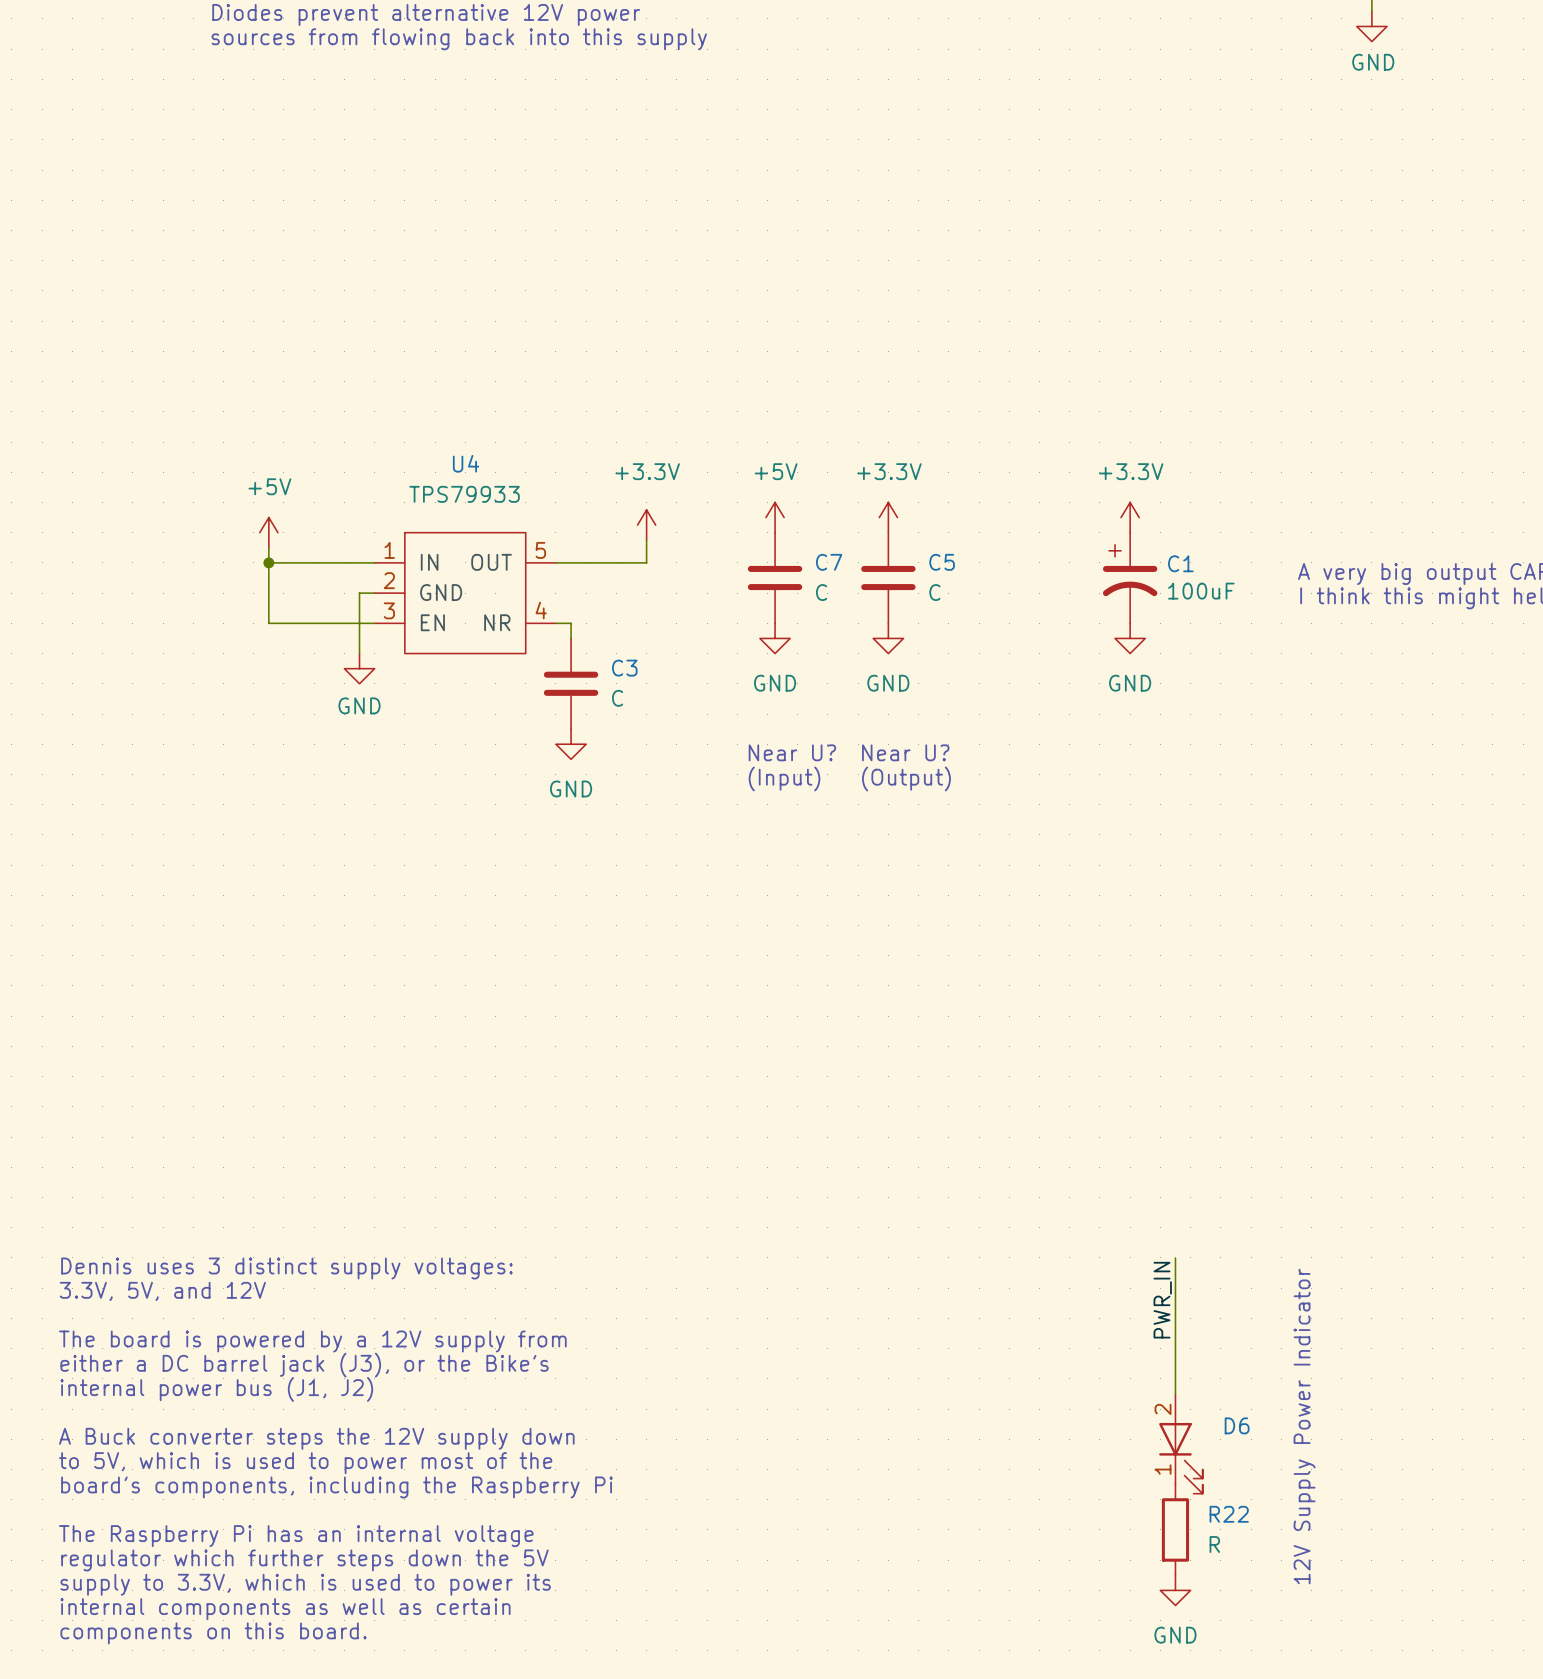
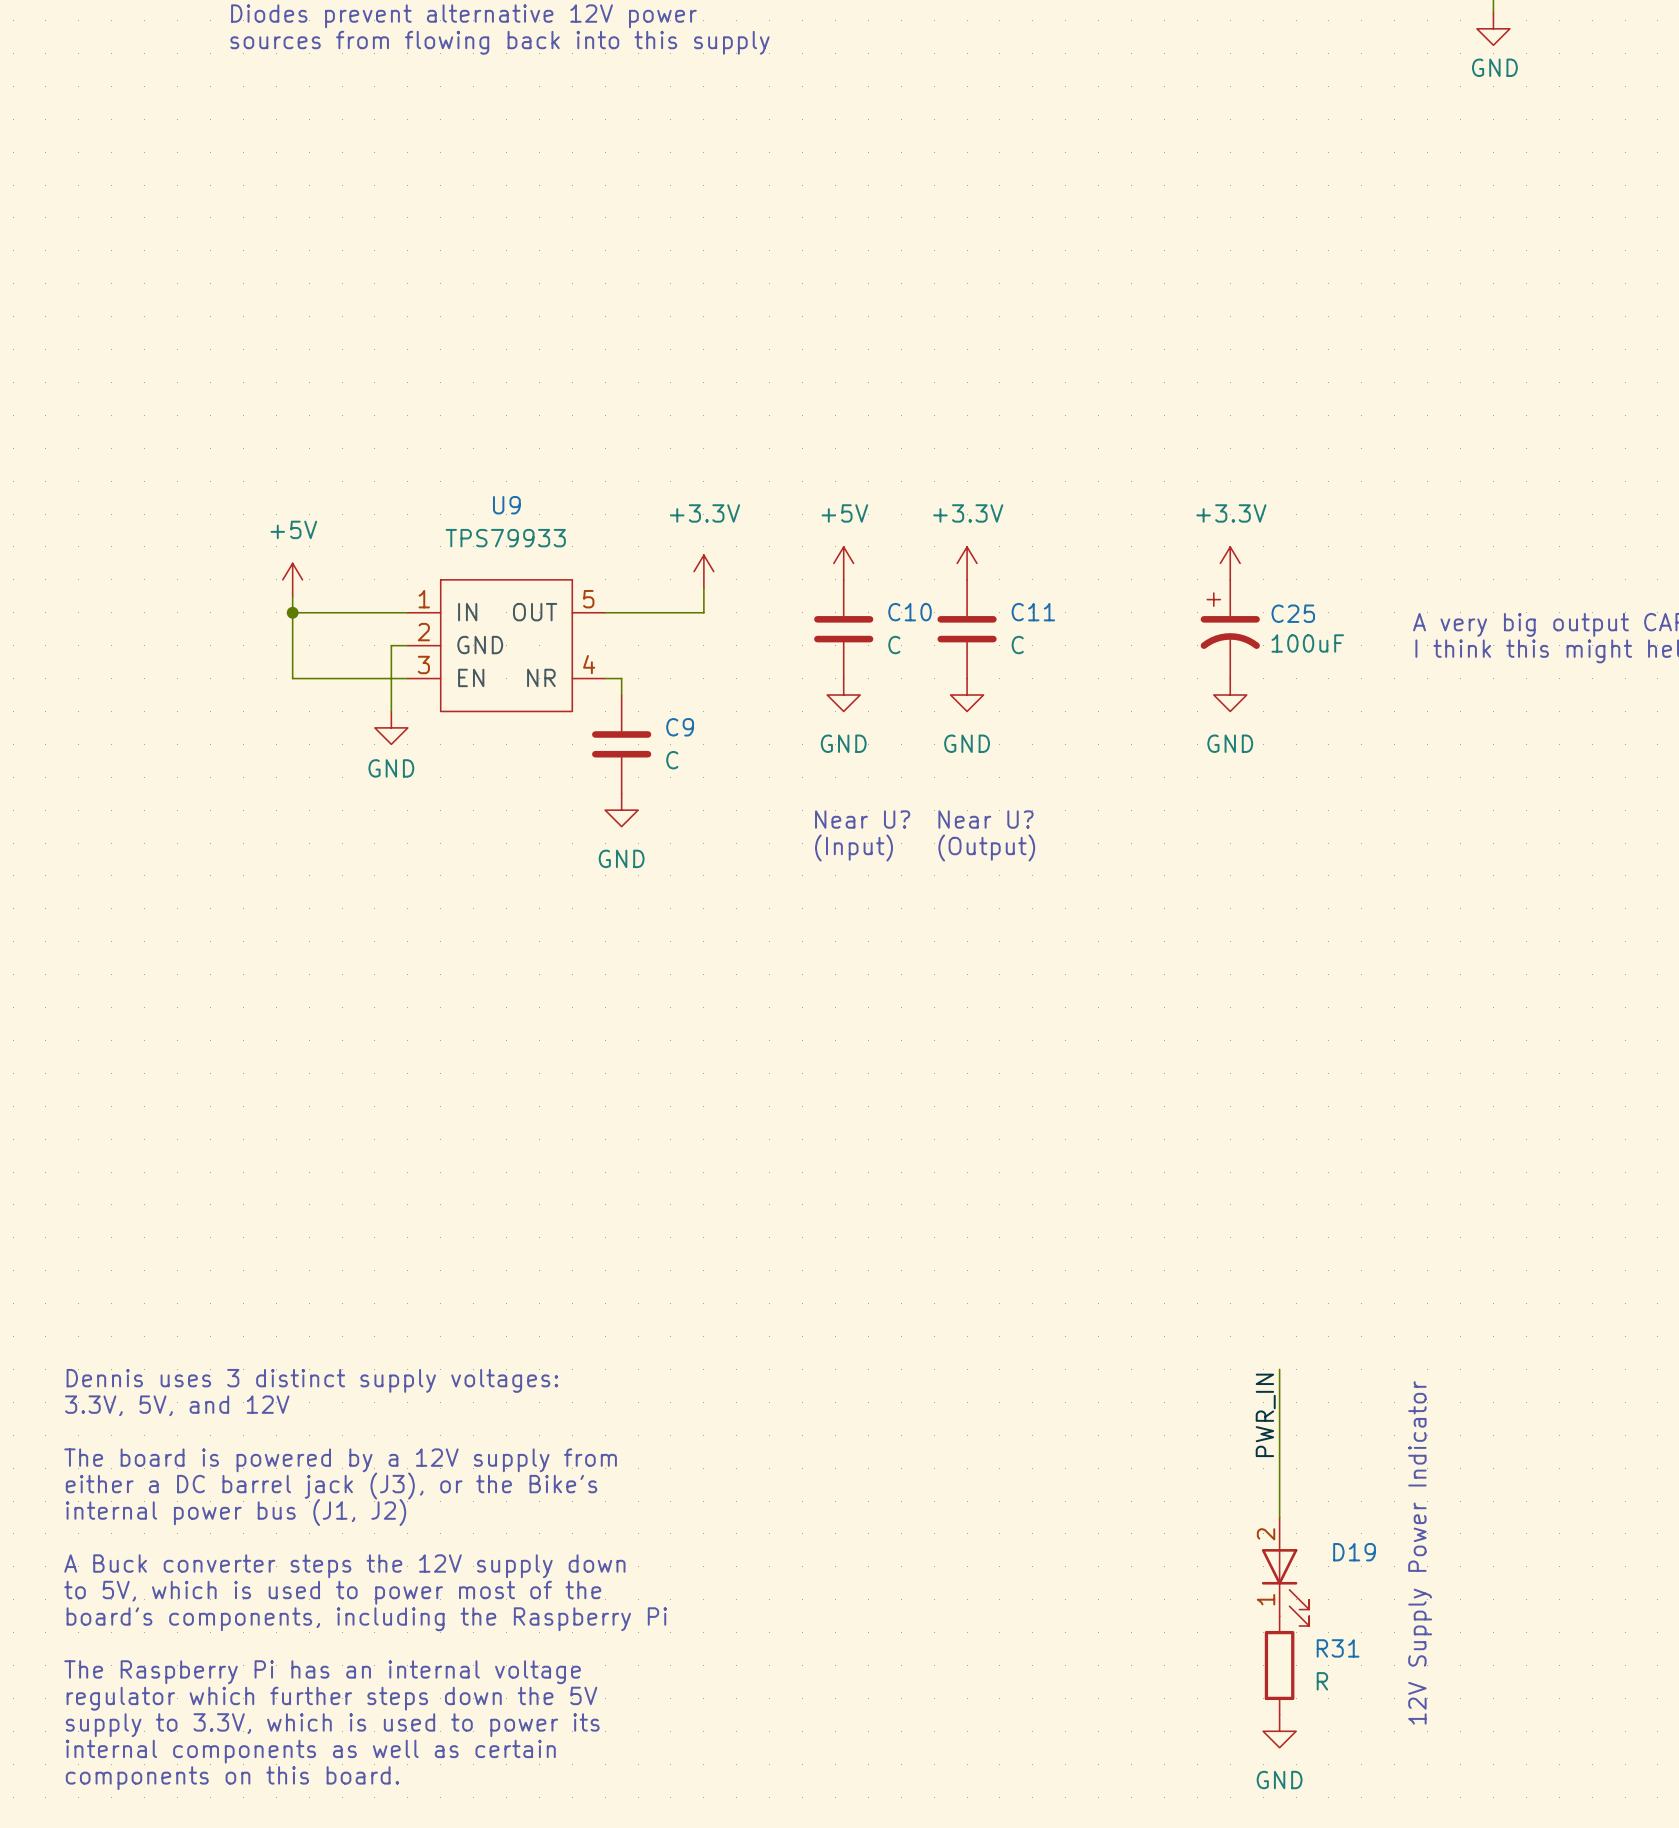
U4 name: U4 (466, 463) -> U9 (506, 505)
C7 name: C7 (829, 562) -> C10 (910, 612)
C5 name: C5 (942, 562) -> C11 (1033, 612)
C1 name: C1 (1180, 563) -> C25 (1293, 613)
C3 name: C3 (624, 668) -> C9 (680, 727)
D6 name: D6 (1237, 1425) -> D19 (1354, 1552)
R22 name: R22 (1229, 1514) -> R31 (1338, 1648)

